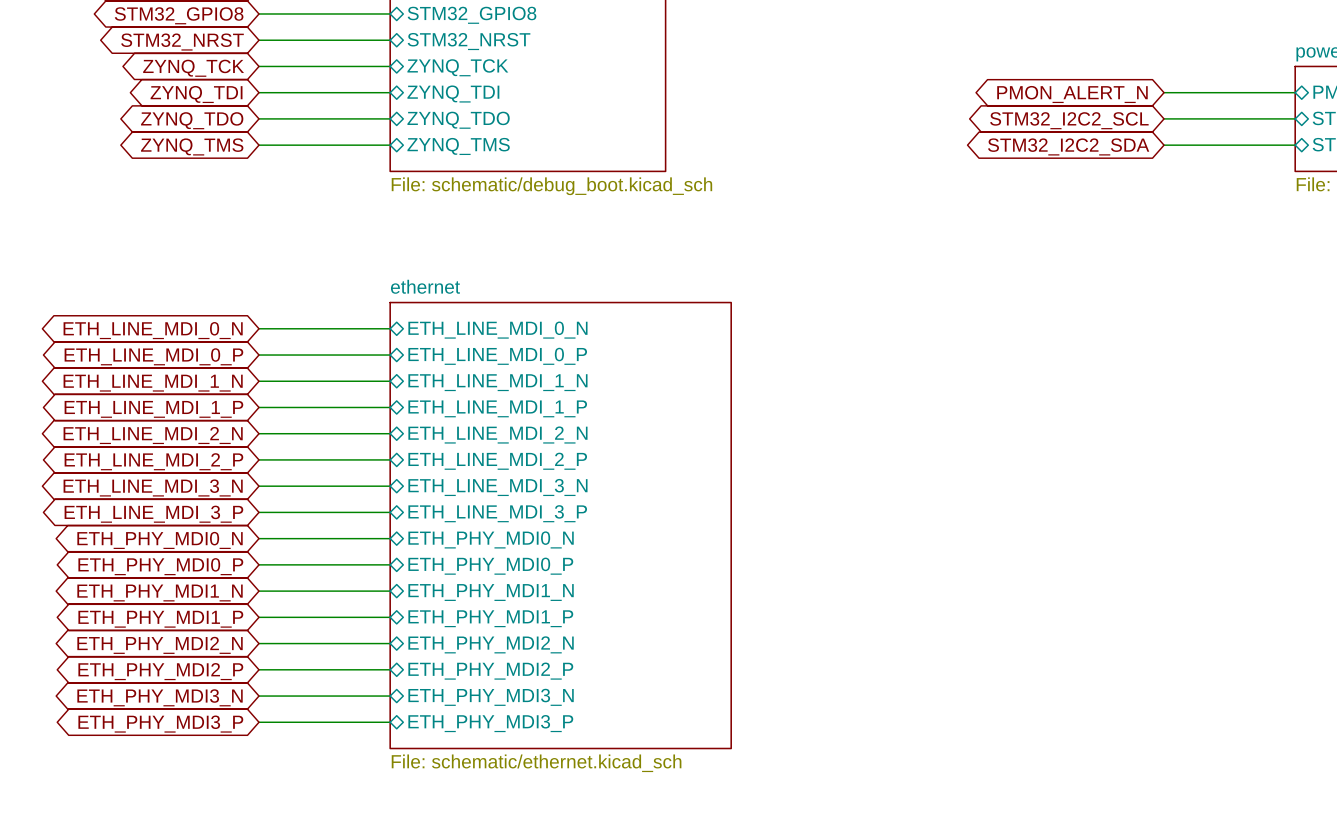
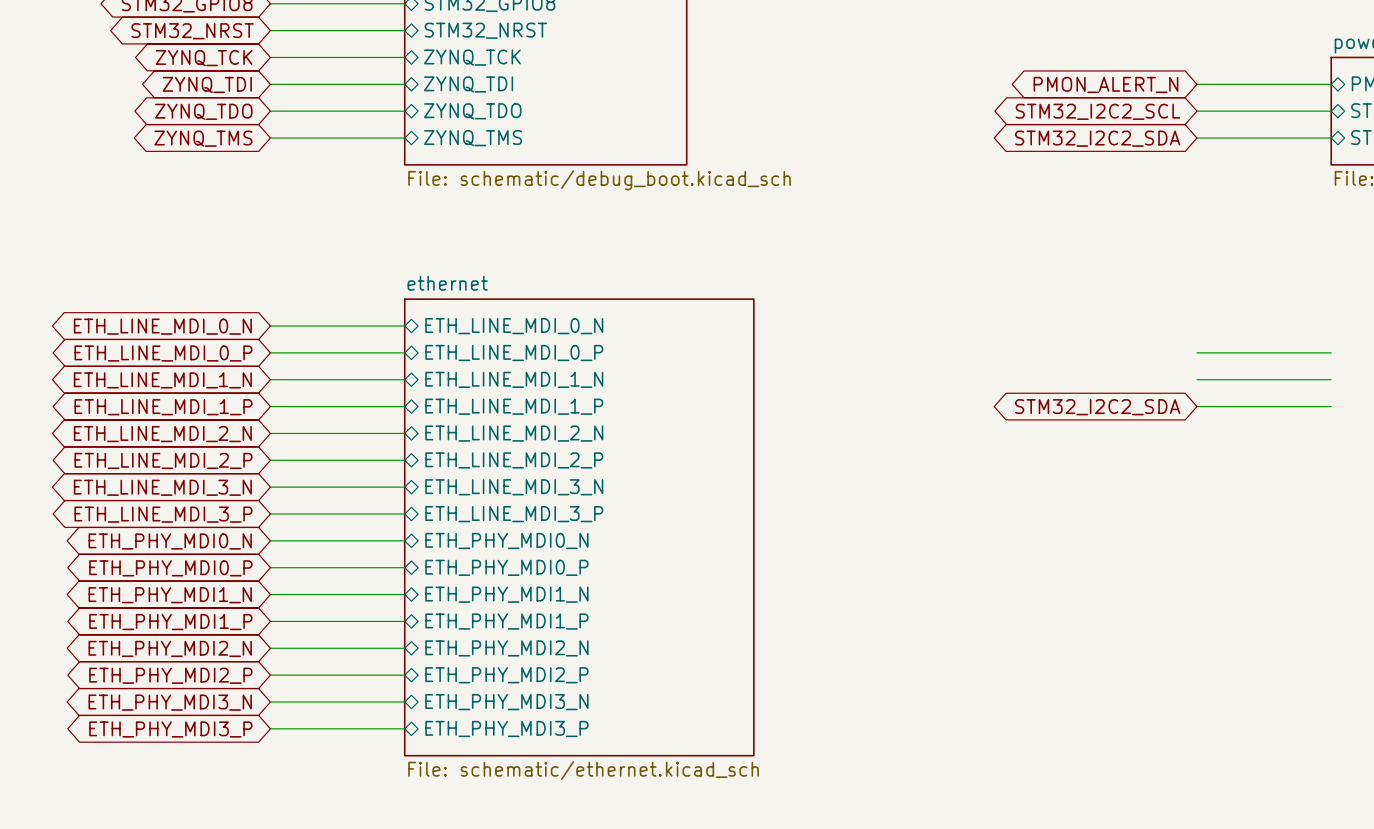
wire: none -> (1196, 352) (1331, 352)
wire: none -> (1196, 379) (1331, 379)
wire: none -> (1196, 406) (1331, 406)
global label: none -> STM32_I2C2_SDA (1097, 407)

